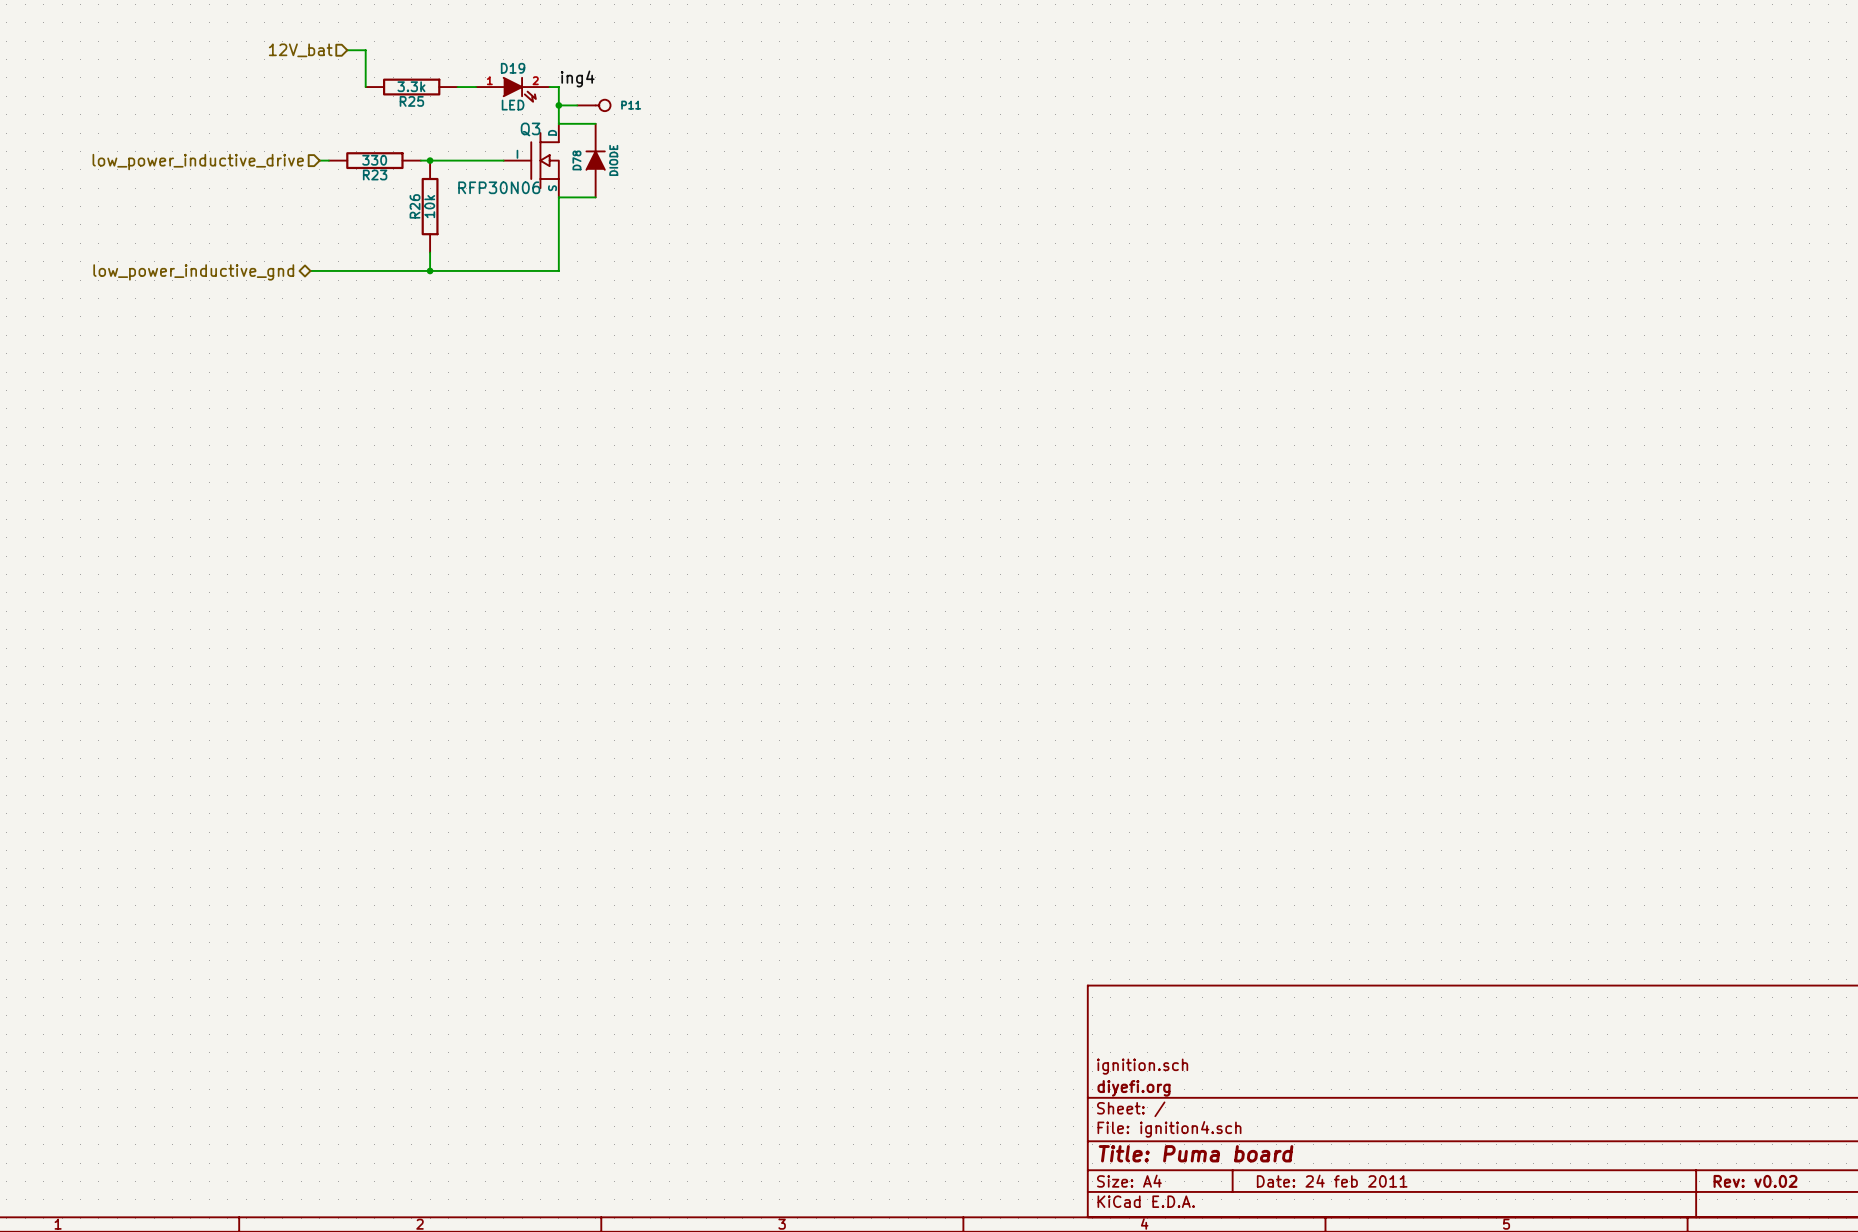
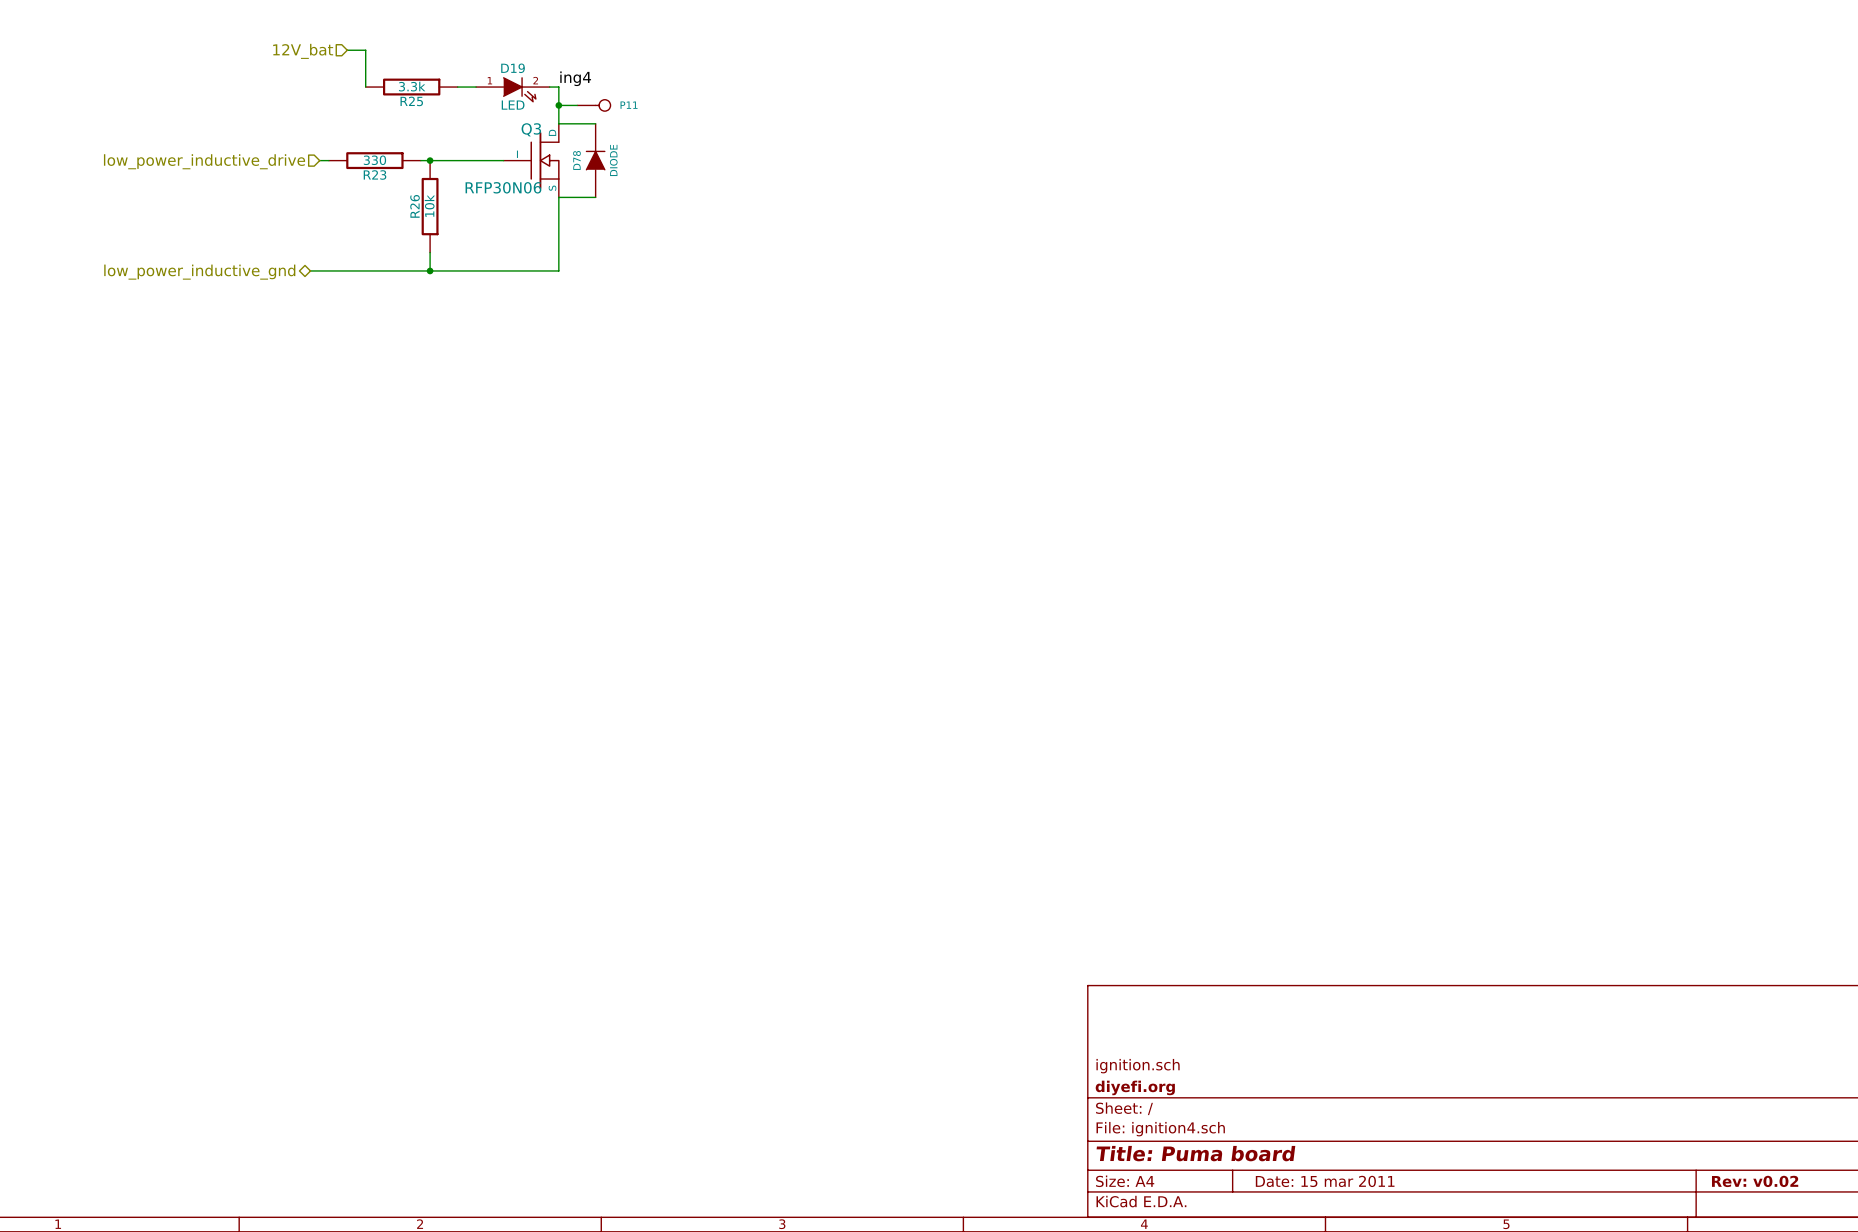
title block: Date: 24 feb 2011 (1332, 1181) -> Date: 15 mar 2011 (1325, 1181)

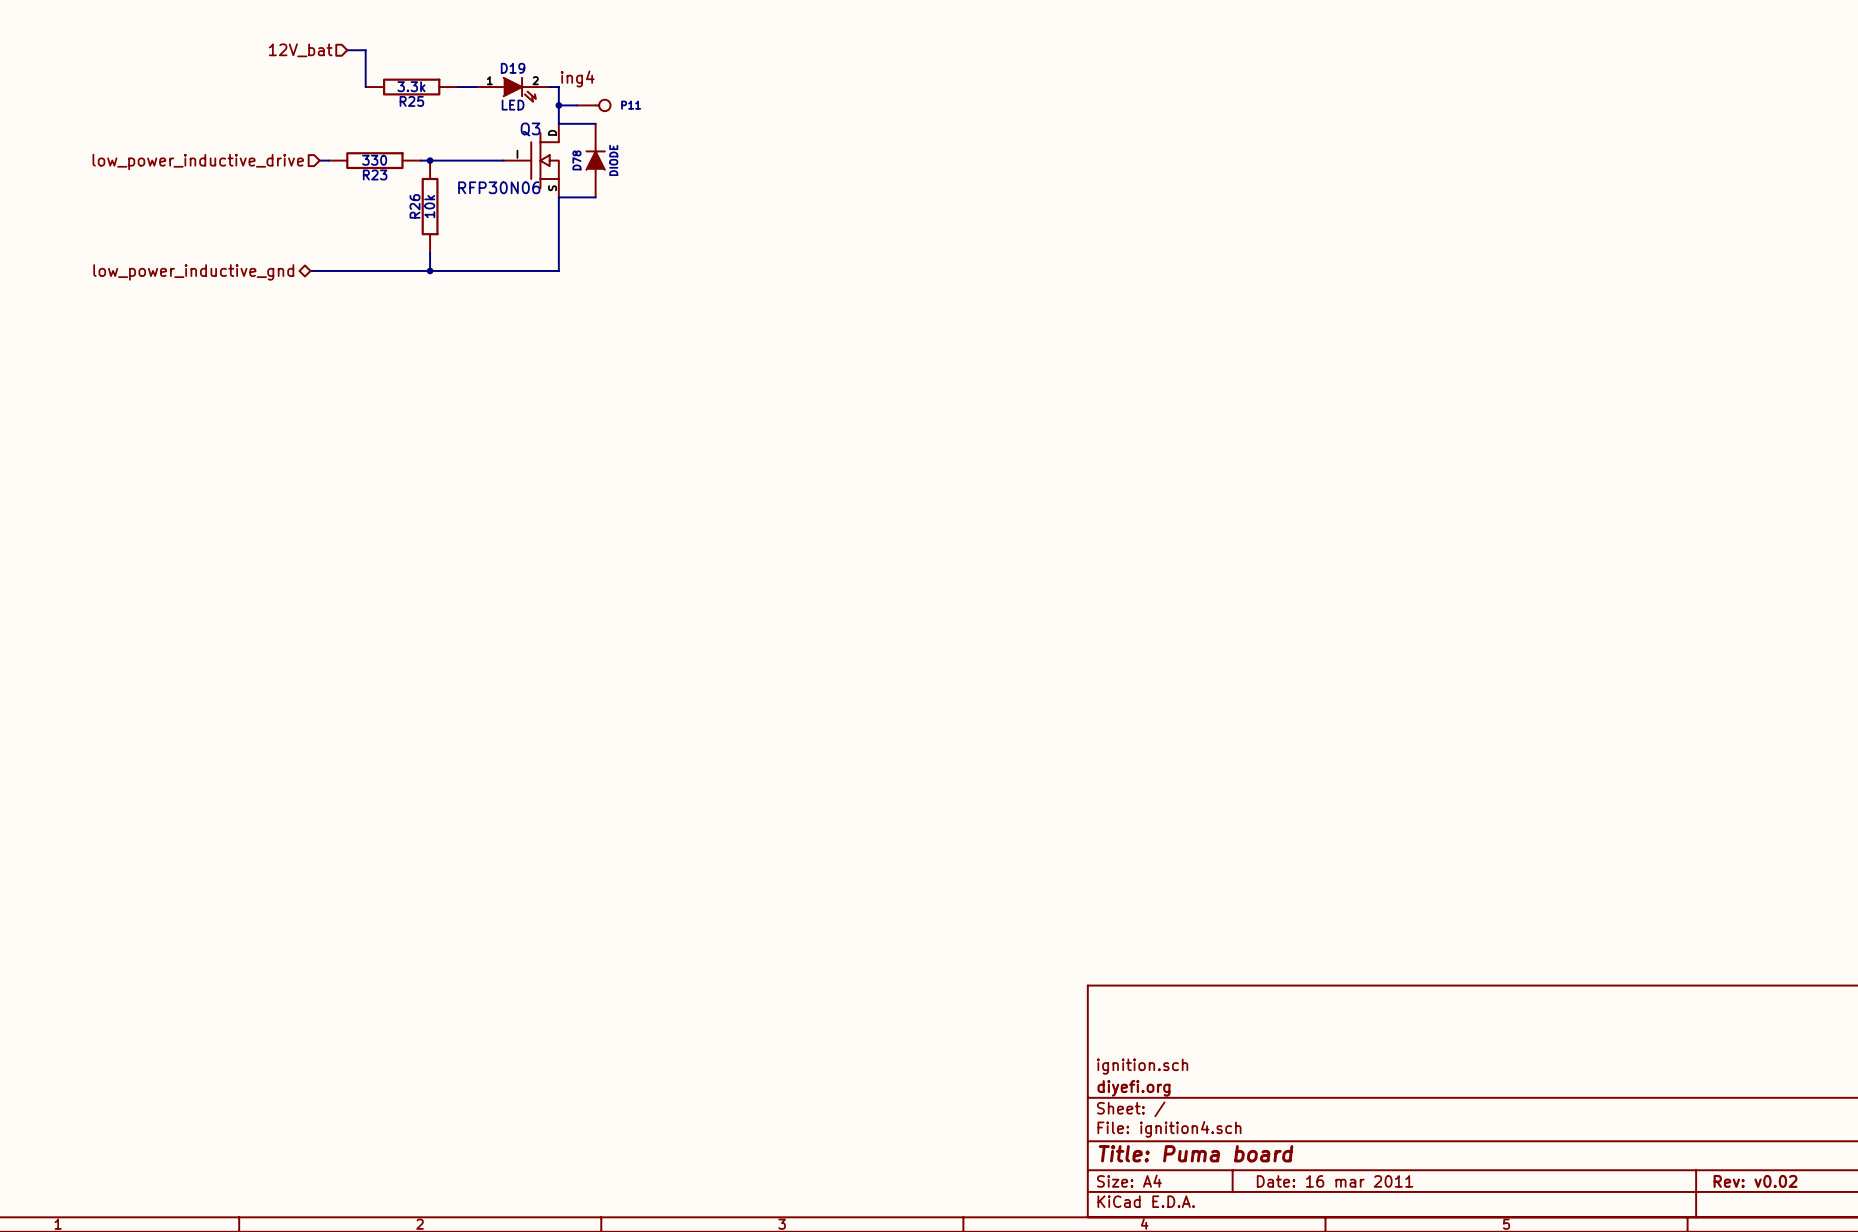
title block: Date: 15 mar 2011 (1325, 1181) -> Date: 16 mar 2011 (1335, 1181)

